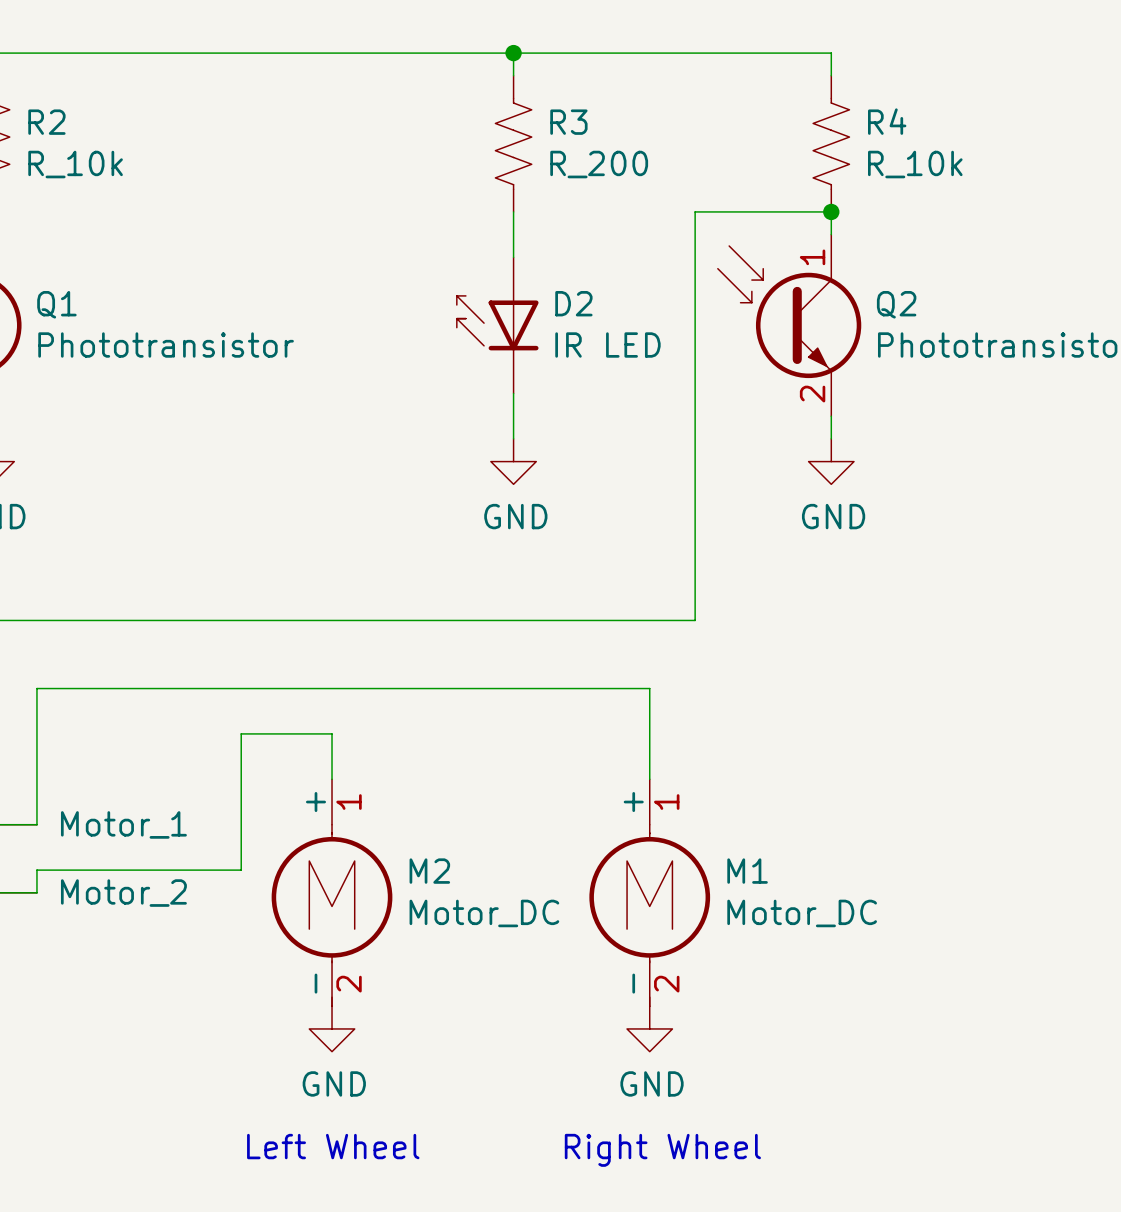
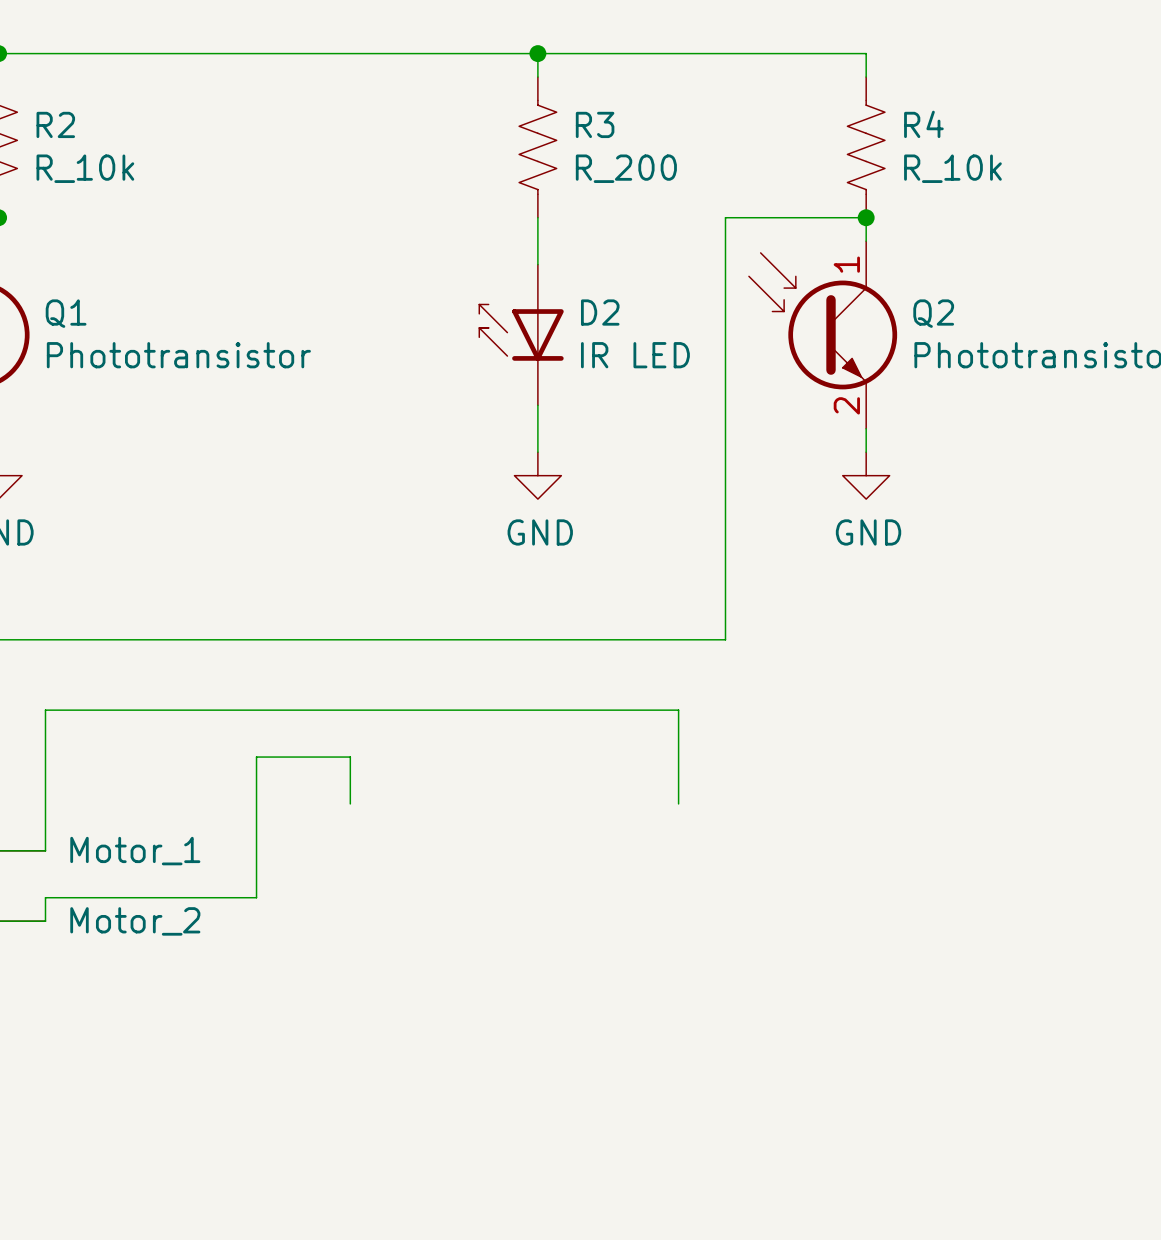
M2: Motor_DC (332, 892) -> none
M1: Motor_DC (649, 892) -> none
power symbol: GND (332, 1028) -> none
power symbol: GND (649, 1028) -> none
text: Left Wheel (333, 1146) -> none
text: Right Wheel (662, 1150) -> none

